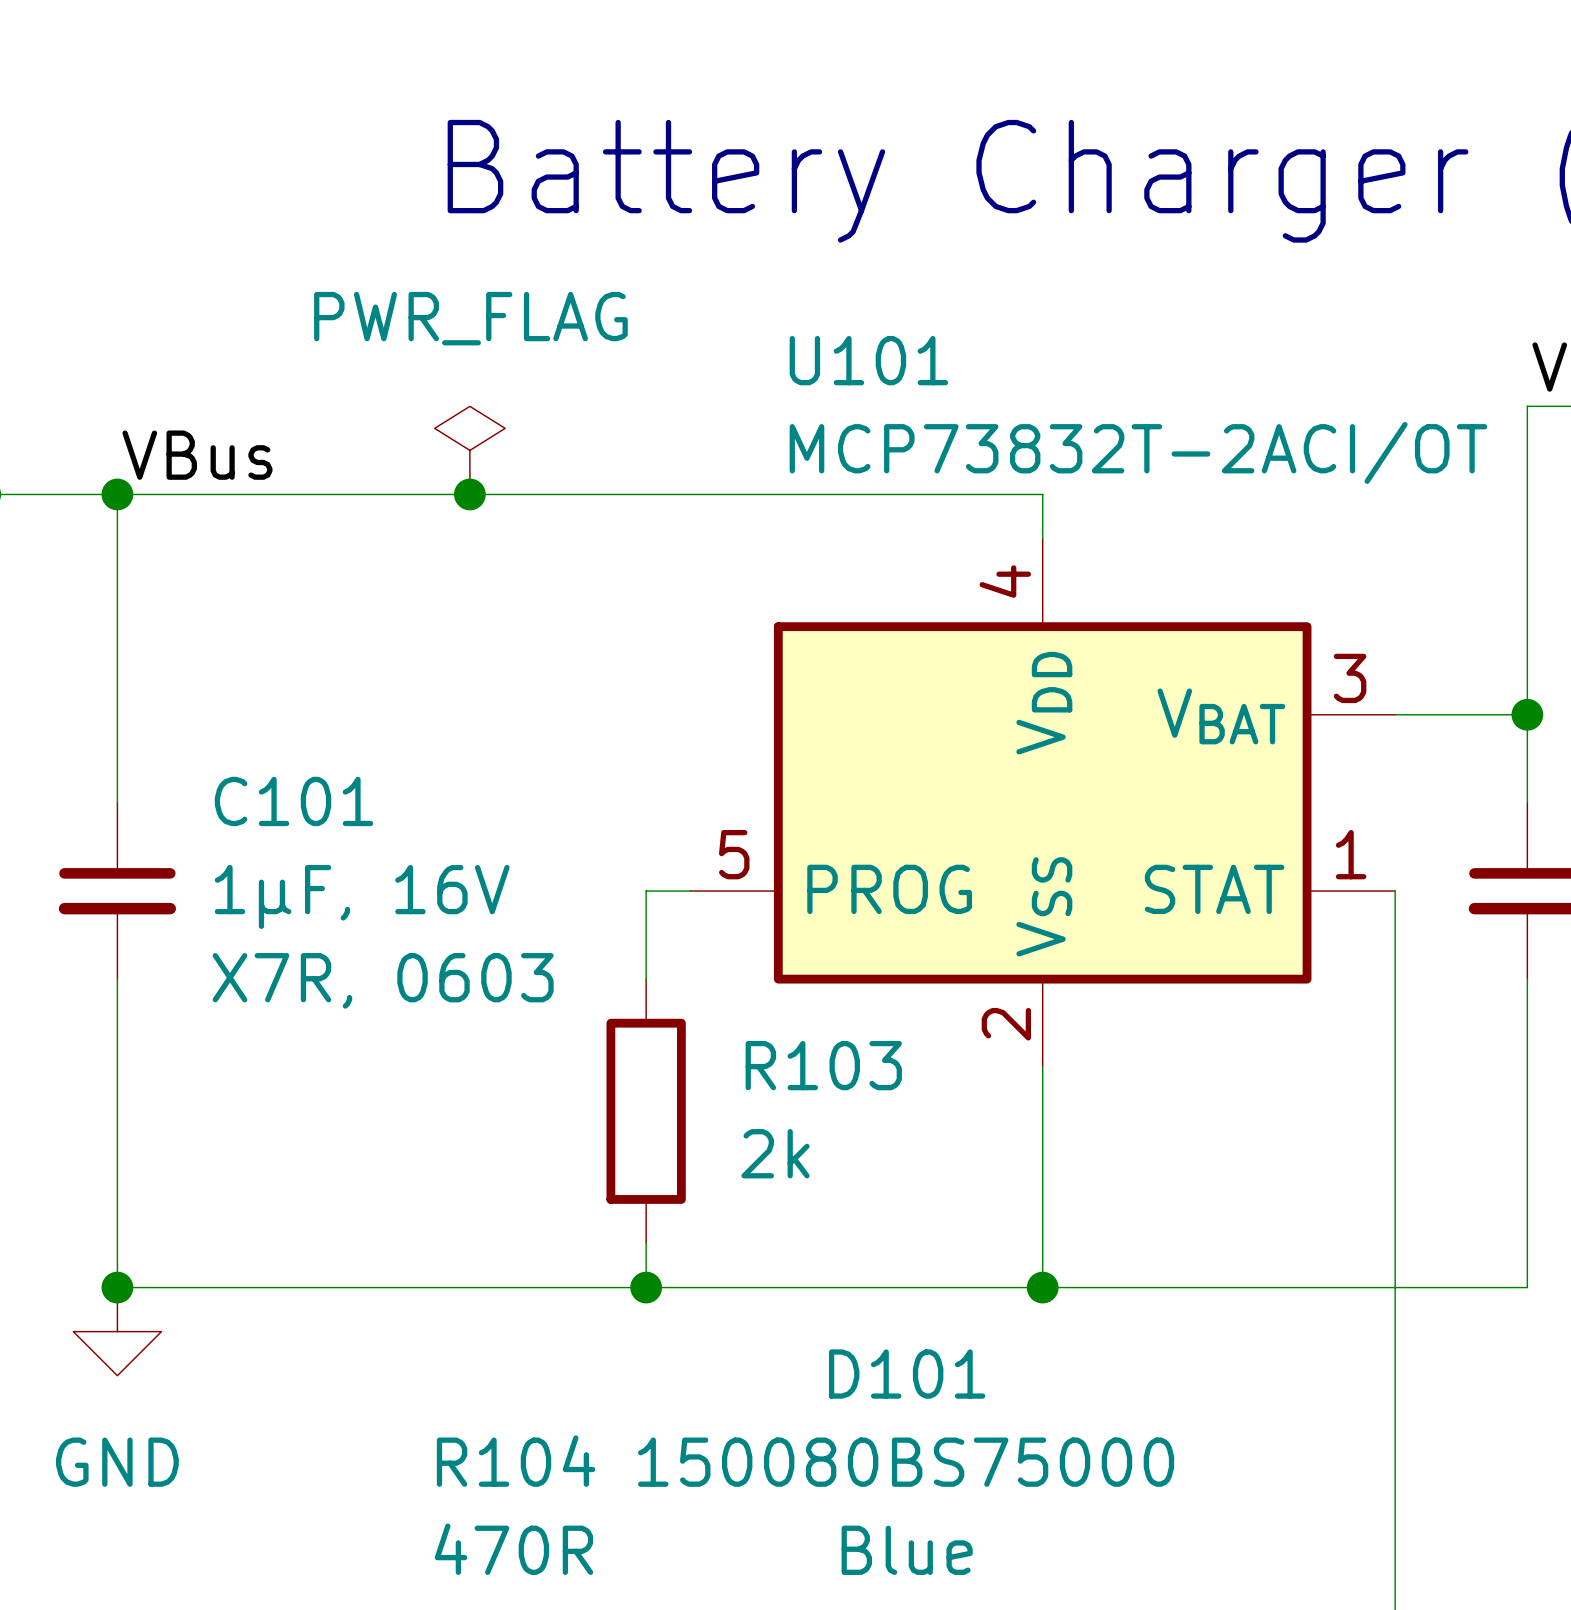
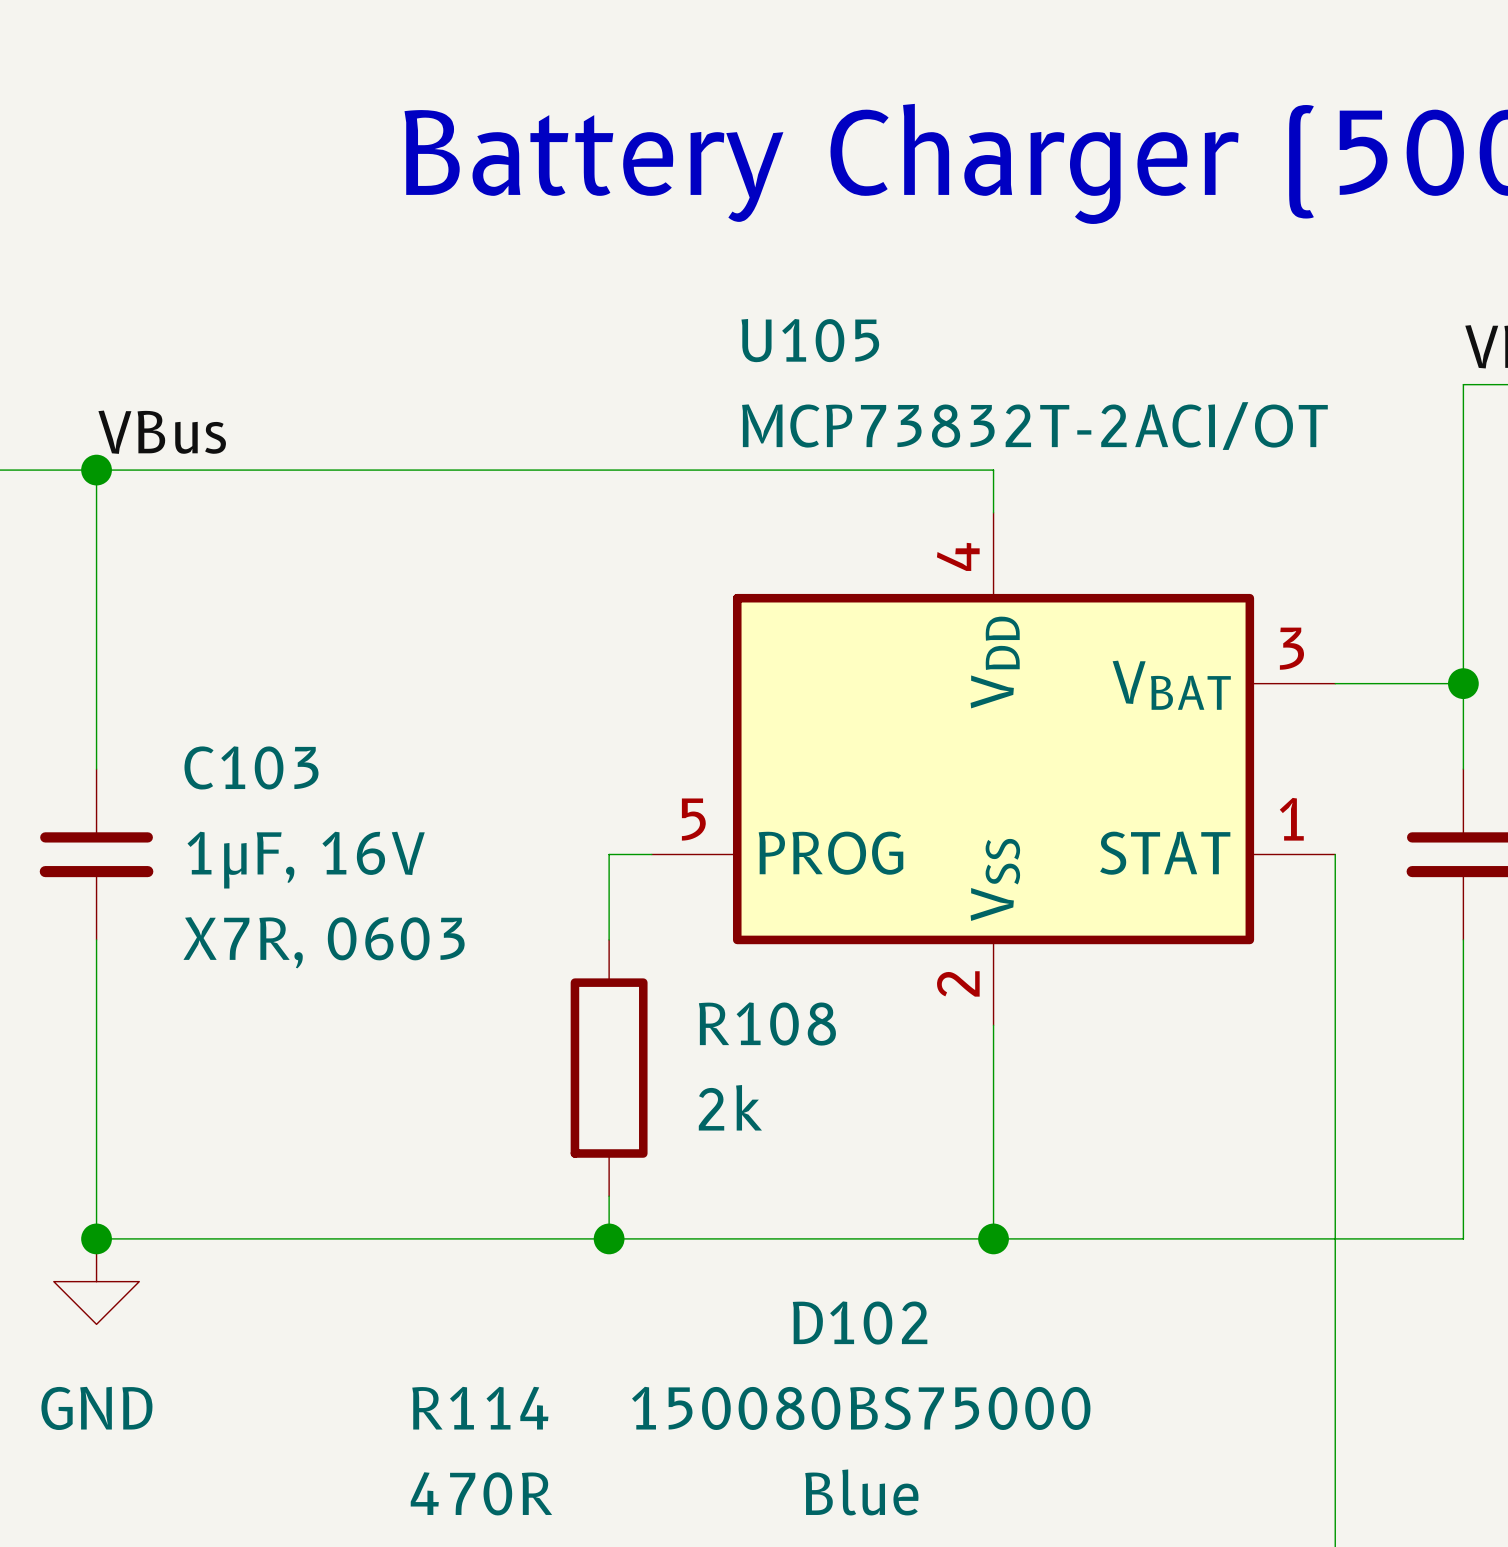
U101 name: U101 (868, 360) -> U105 (810, 340)
power symbol: PWR_FLAG (469, 450) -> none
junction: (469, 494) -> none
C101 name: C101 (293, 801) -> C103 (251, 767)
R103 name: R103 (823, 1065) -> R108 (767, 1023)
D101 name: D101 (907, 1374) -> D102 (860, 1322)
R104 name: R104 (516, 1461) -> R114 (480, 1408)

